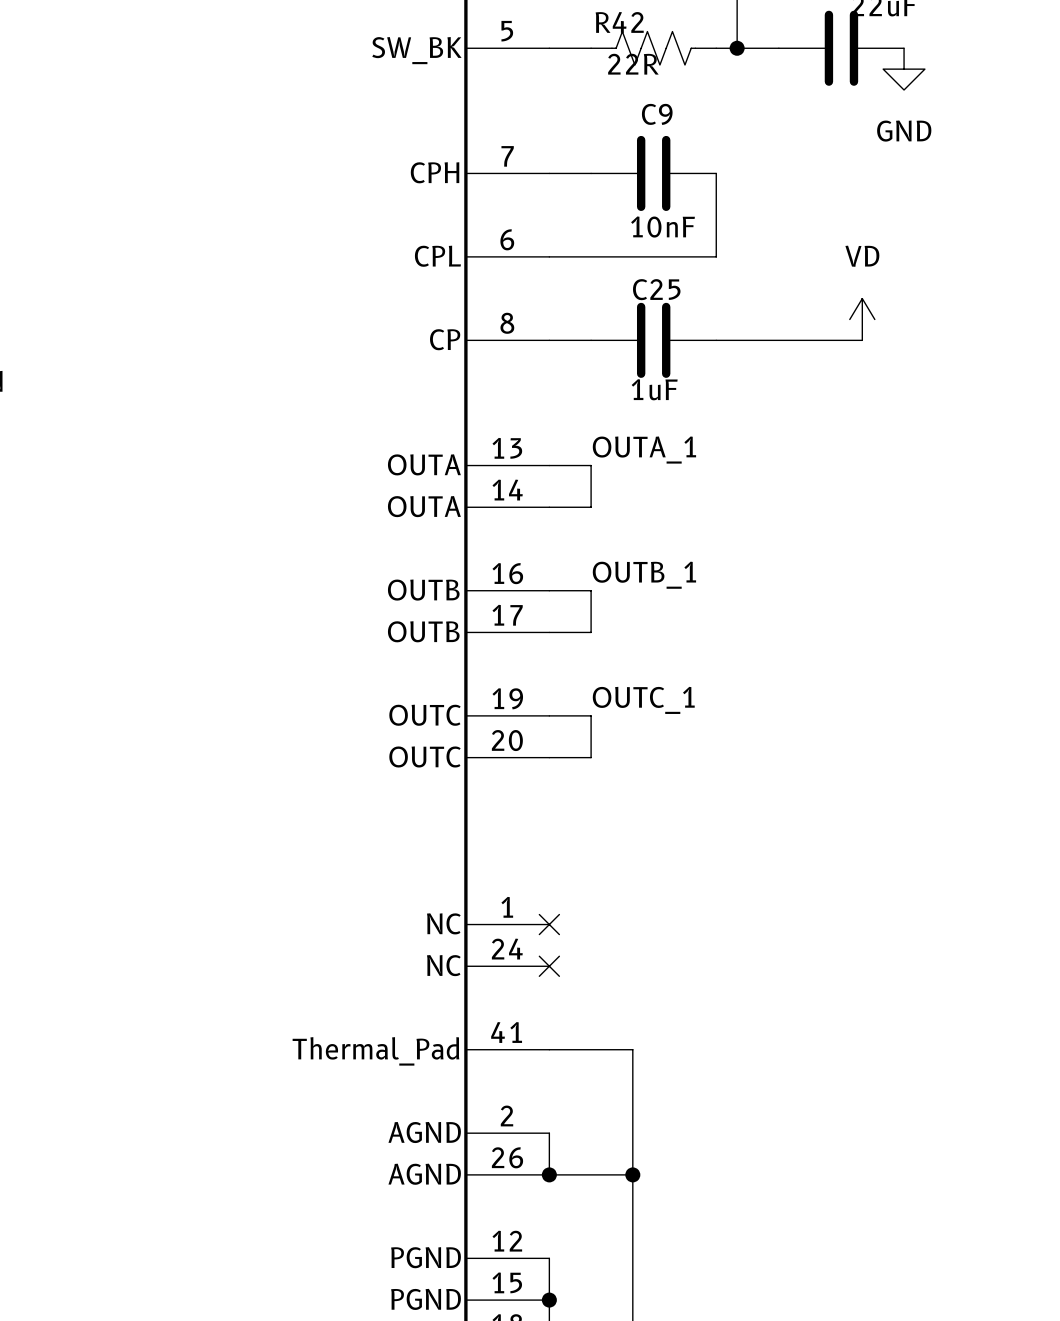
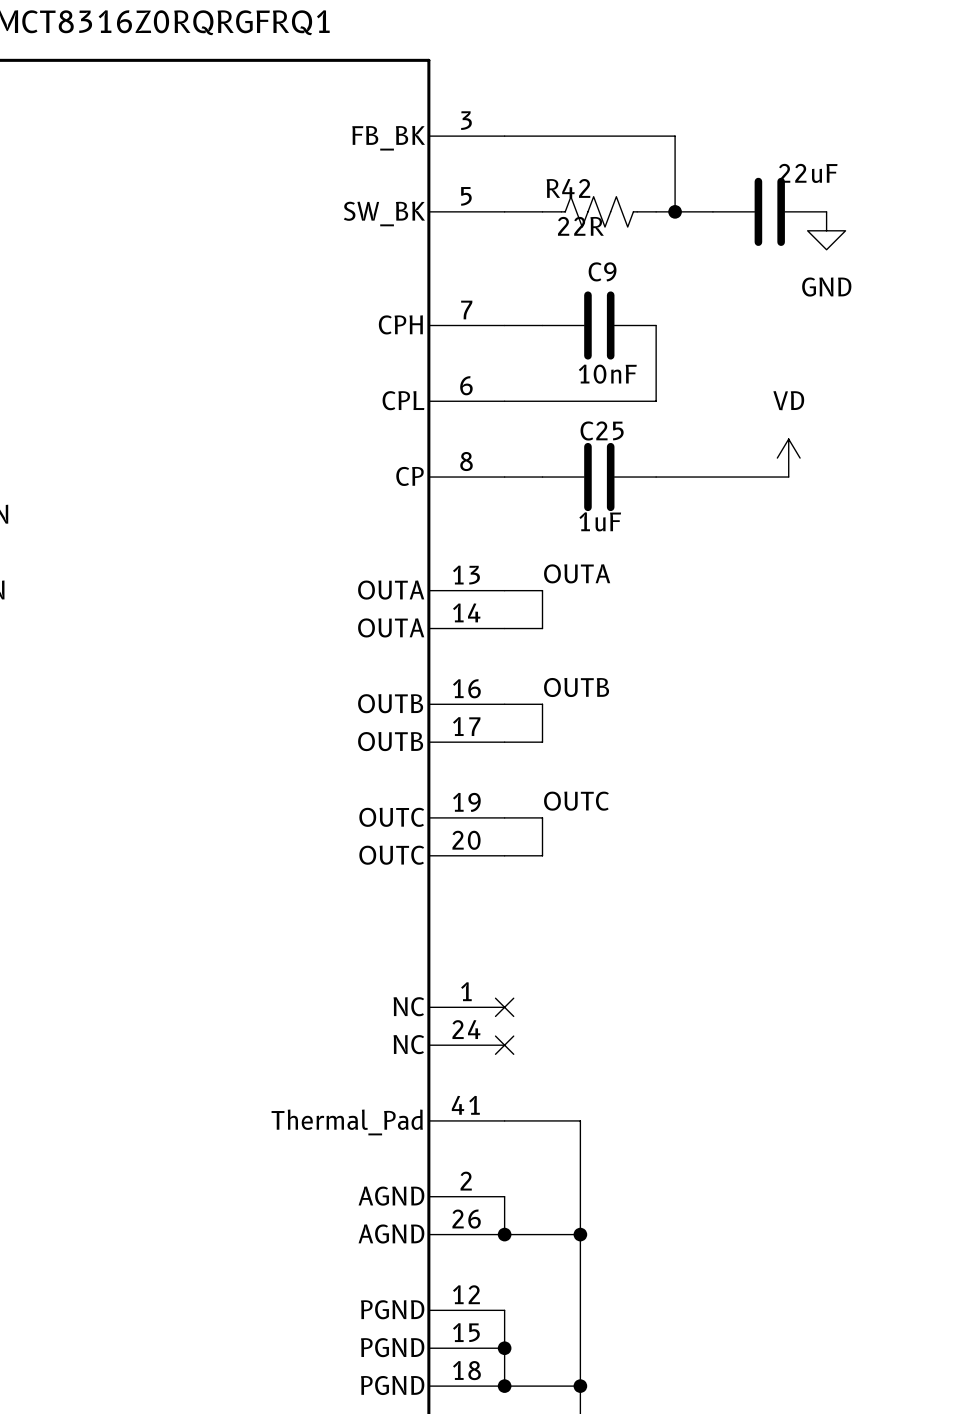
label: OUTA_1 (644, 450) -> OUTA (577, 573)
label: OUTB_1 (644, 575) -> OUTB (576, 687)
label: OUTC_1 (643, 700) -> OUTC (576, 801)

